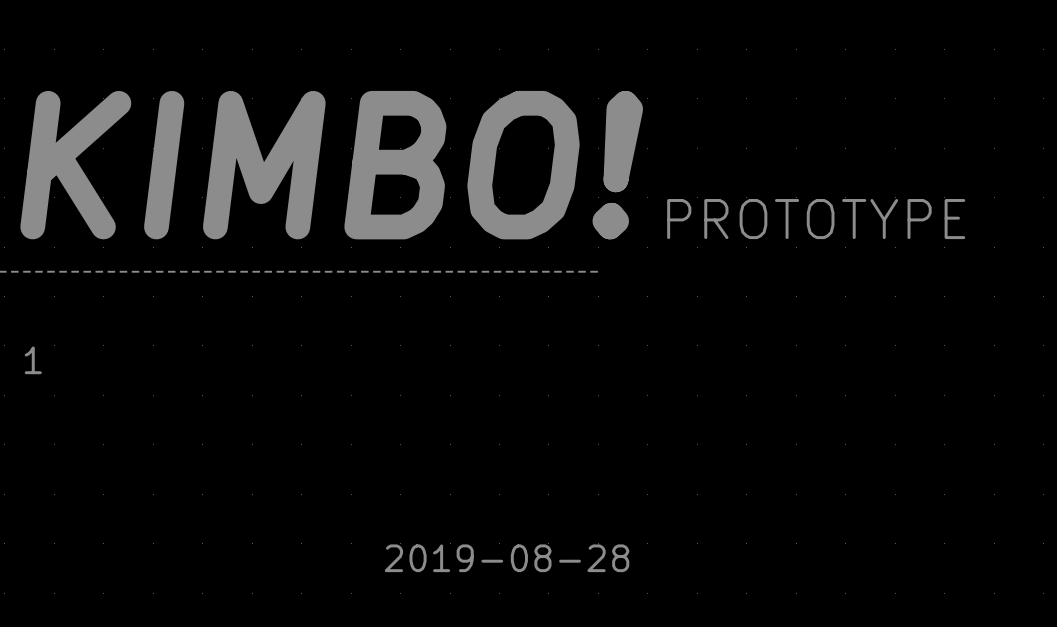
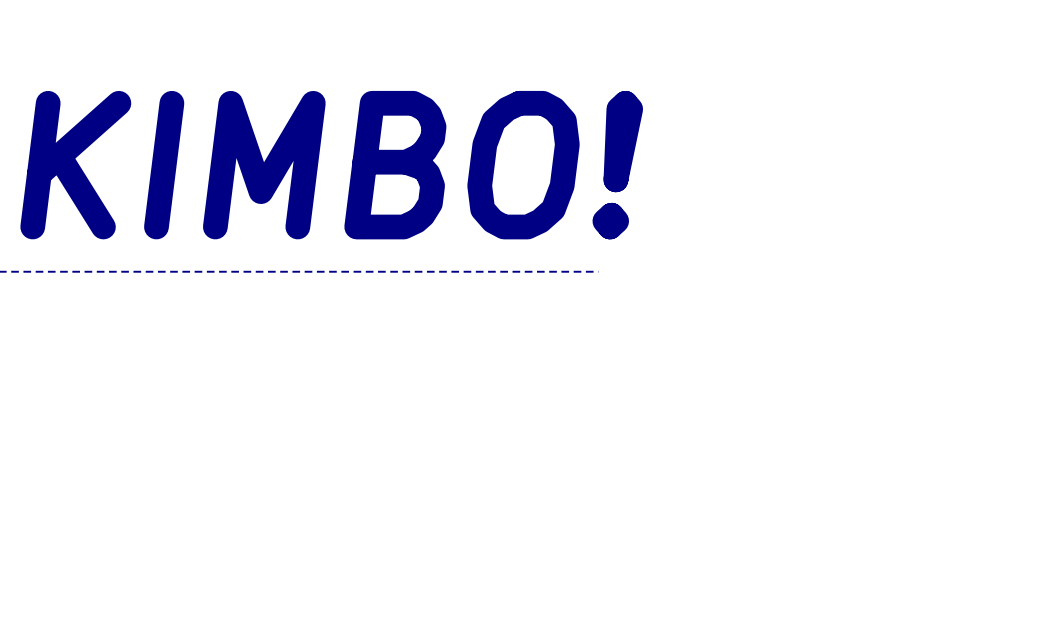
text: PROTOTYPE (816, 219) -> none
text: 1 (33, 360) -> none
text: 2019-08-28 (507, 558) -> none

